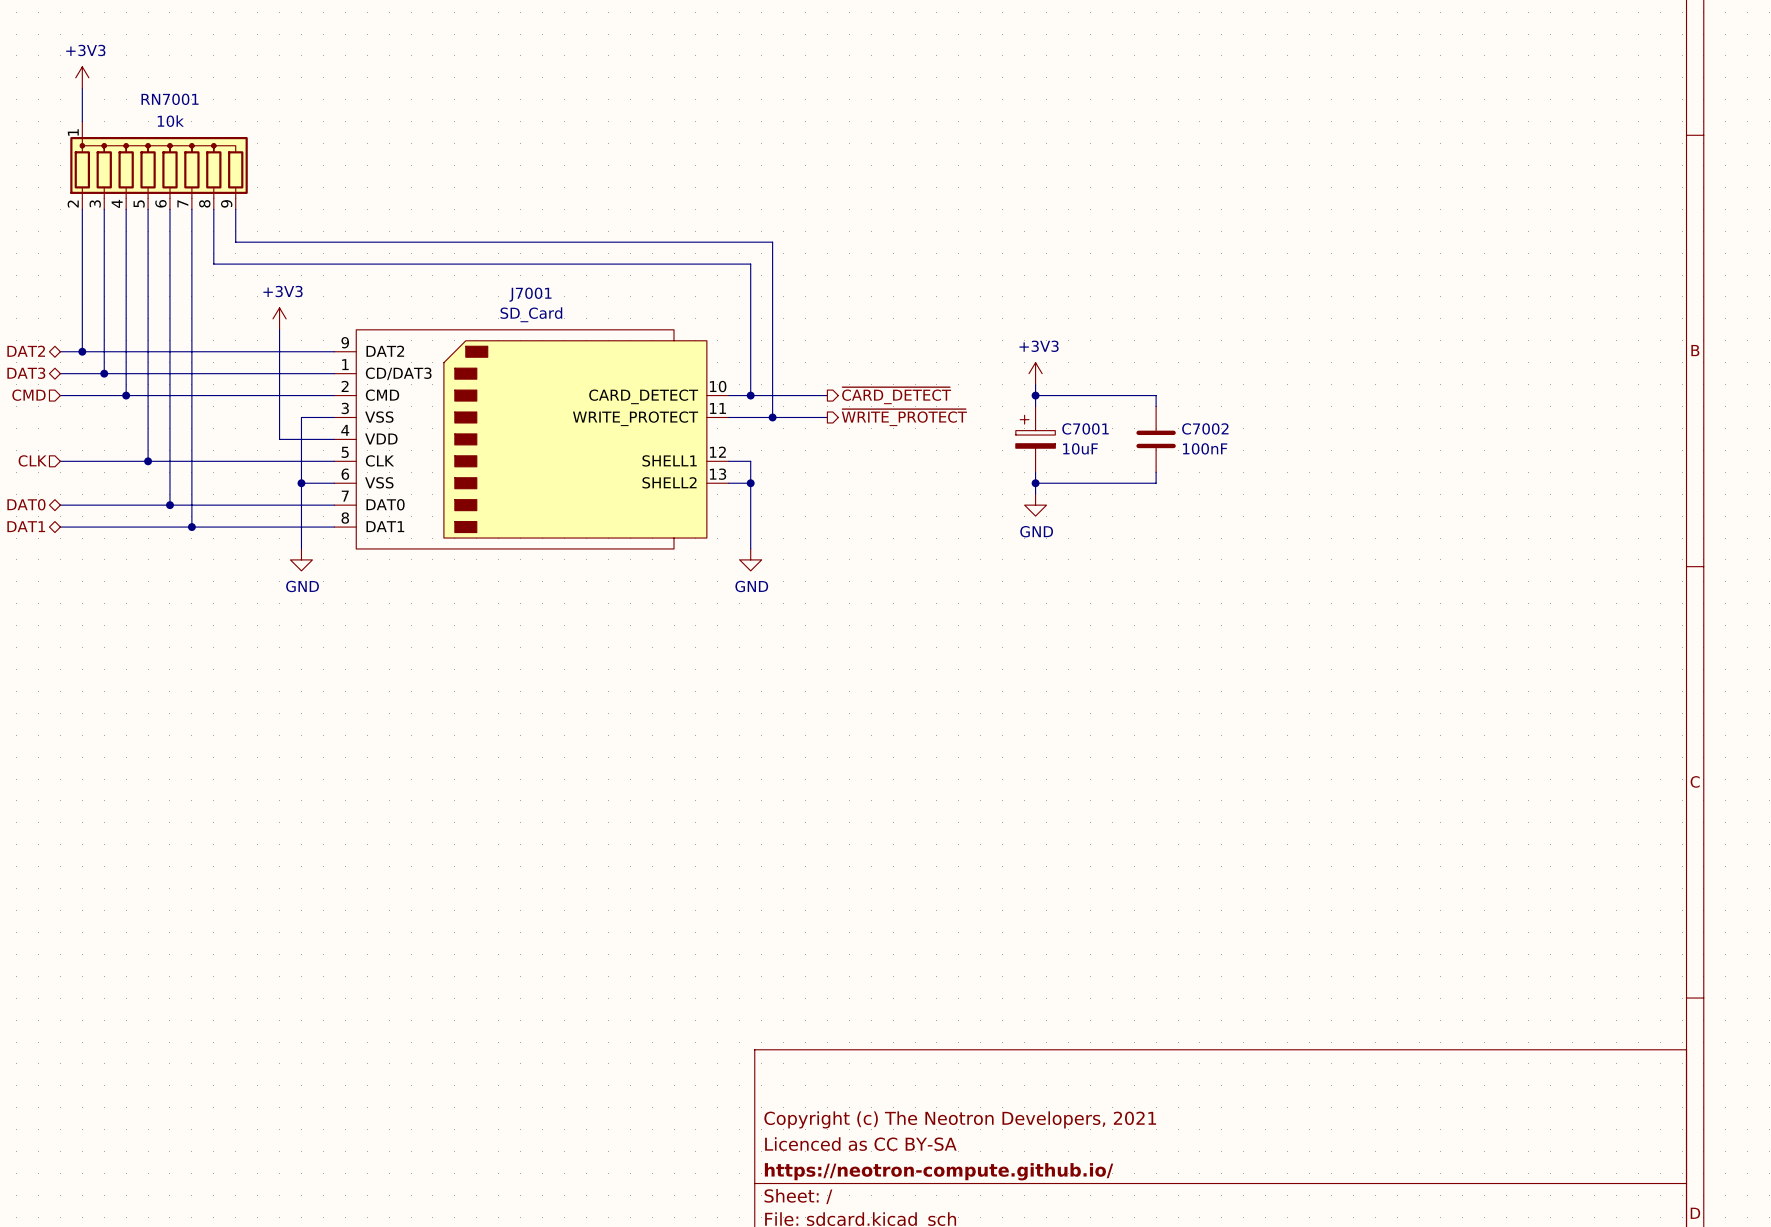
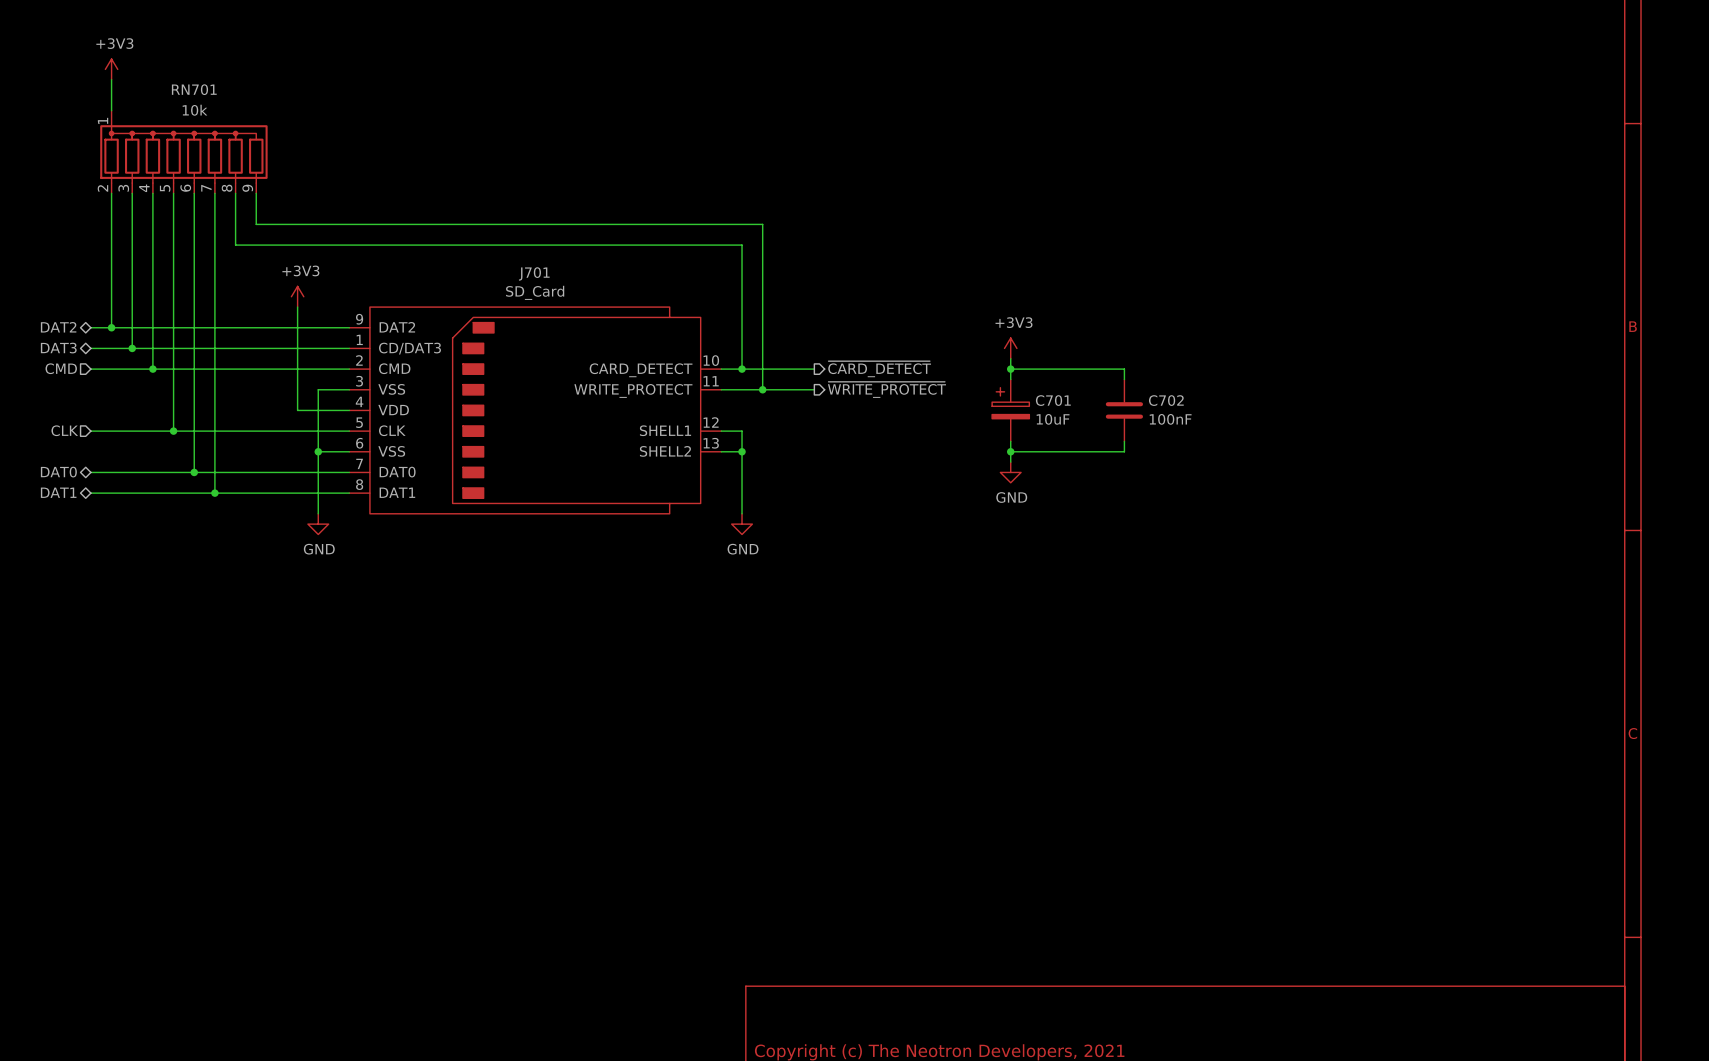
RN7001 name: RN7001 (170, 99) -> RN701 (194, 89)
J7001 name: J7001 (530, 294) -> J701 (534, 273)
C7001 name: C7001 (1085, 428) -> C701 (1053, 400)
C7002 name: C7002 (1205, 428) -> C702 (1166, 400)

